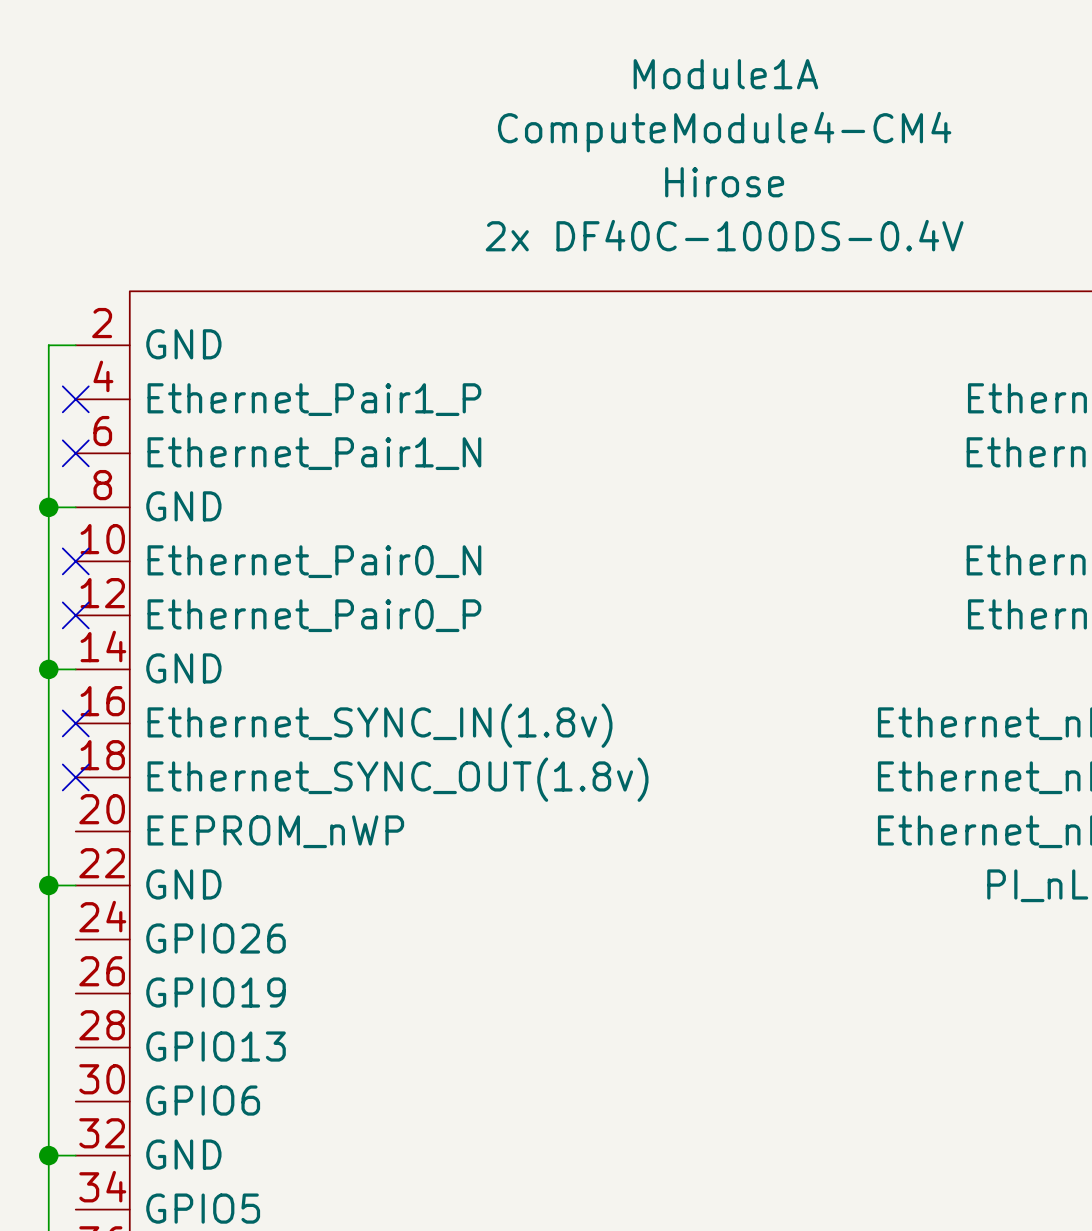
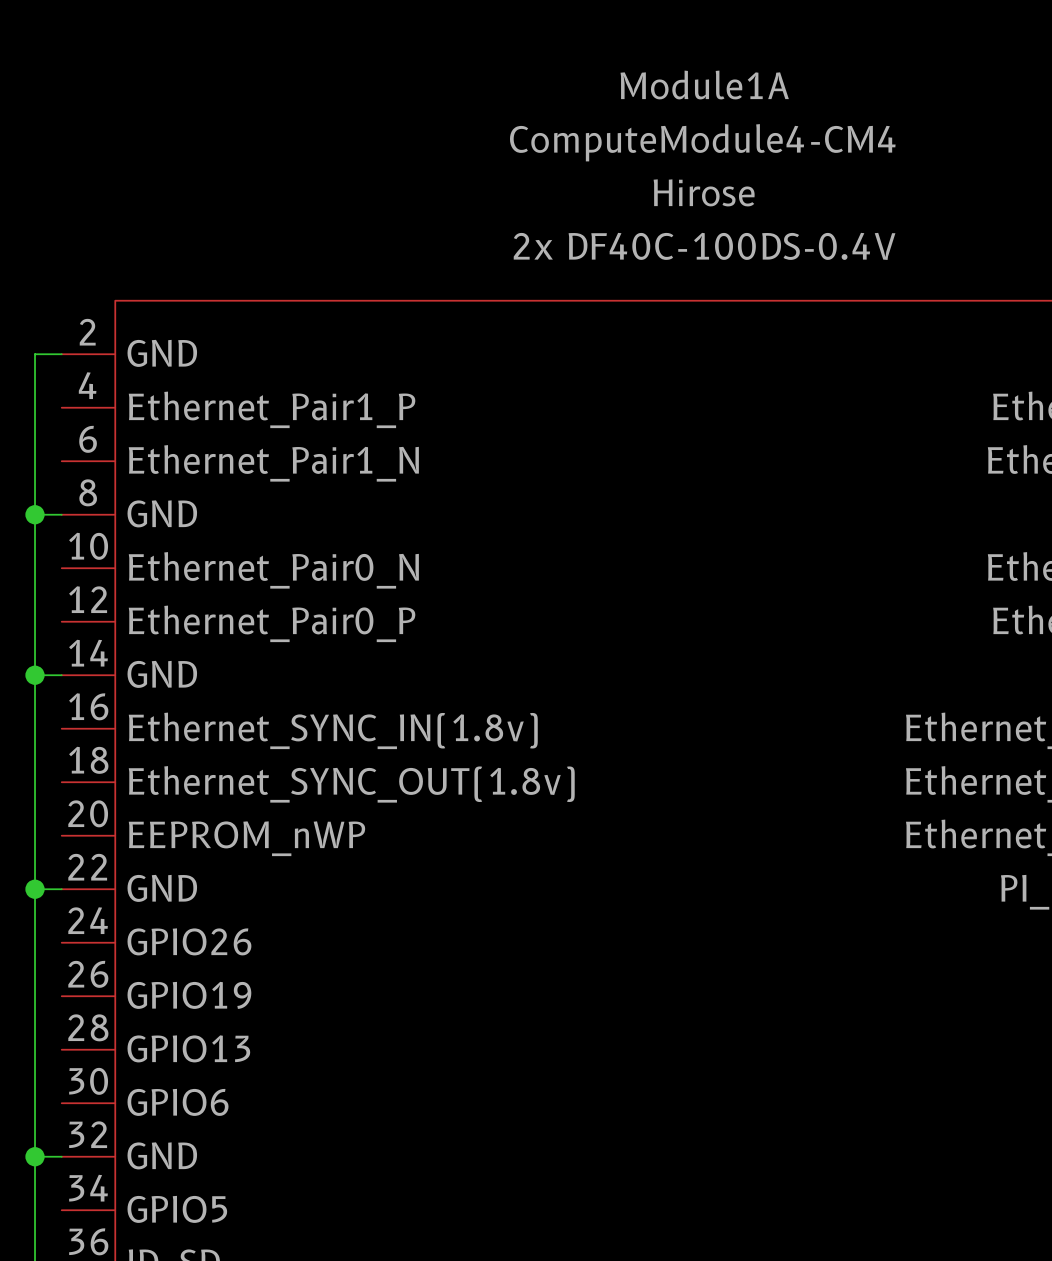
no-connect mark: (75, 399) -> none
no-connect mark: (75, 453) -> none
no-connect mark: (75, 561) -> none
no-connect mark: (75, 615) -> none
no-connect mark: (75, 723) -> none
no-connect mark: (75, 777) -> none

